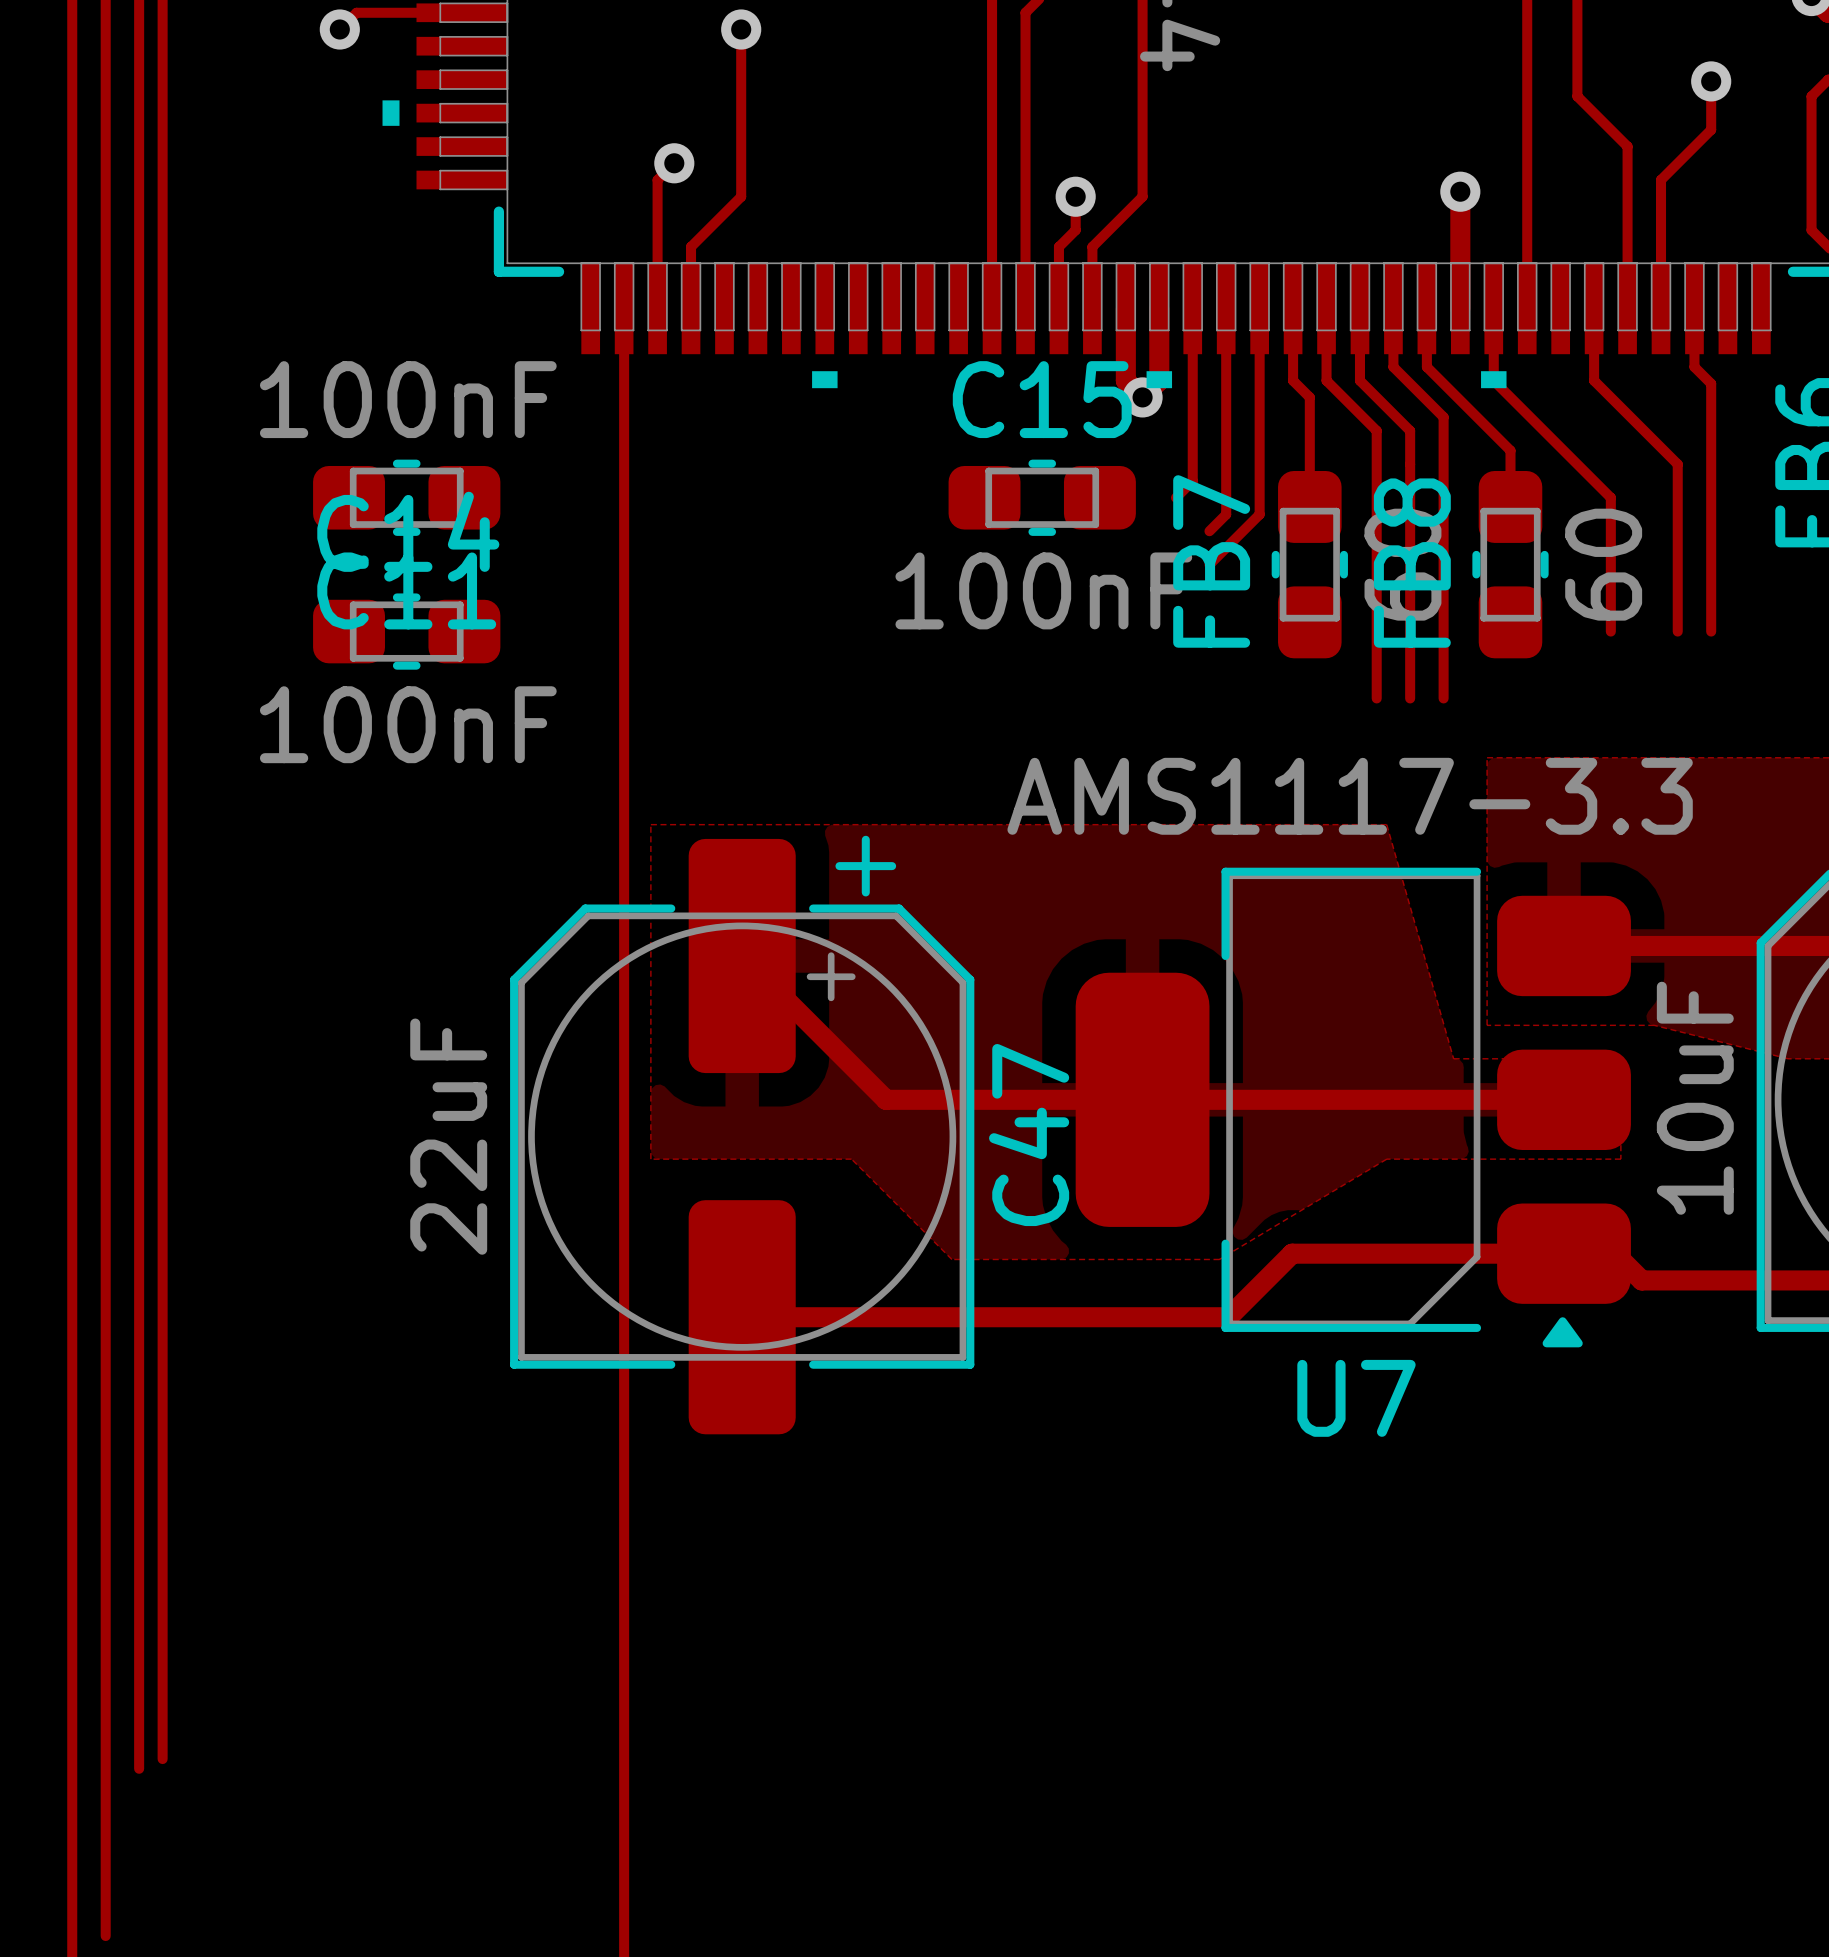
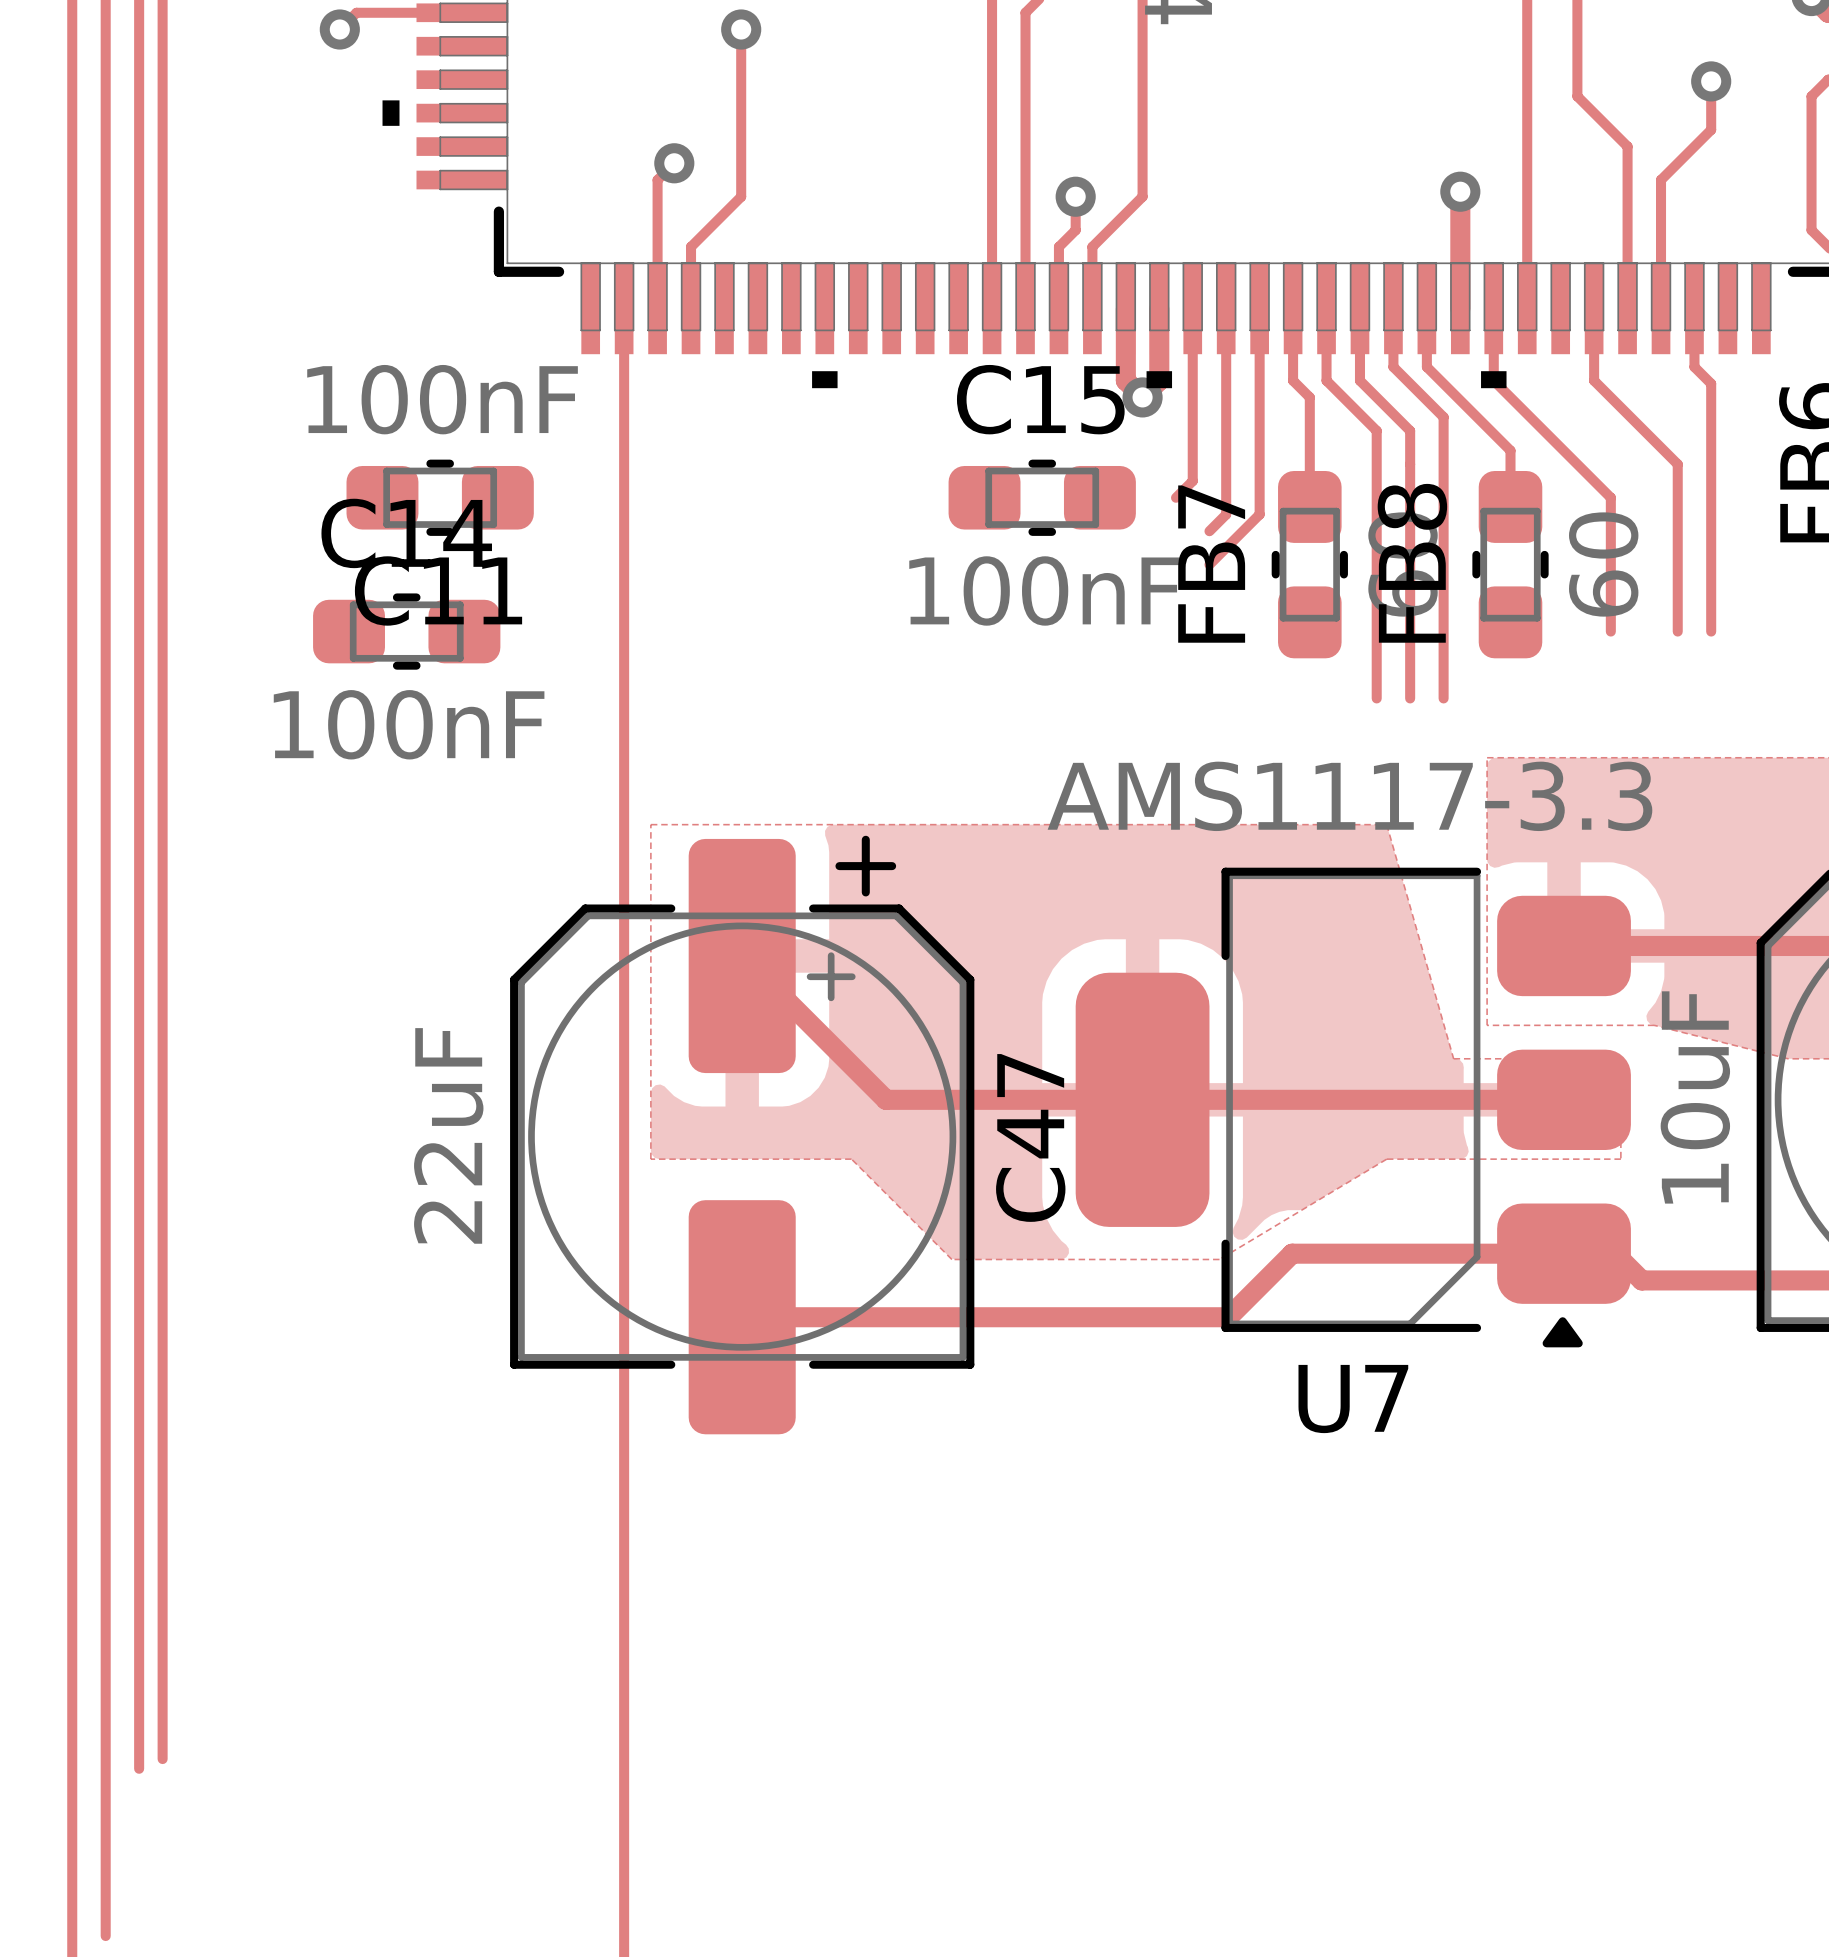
C11 position: (406, 497) -> (440, 497)

